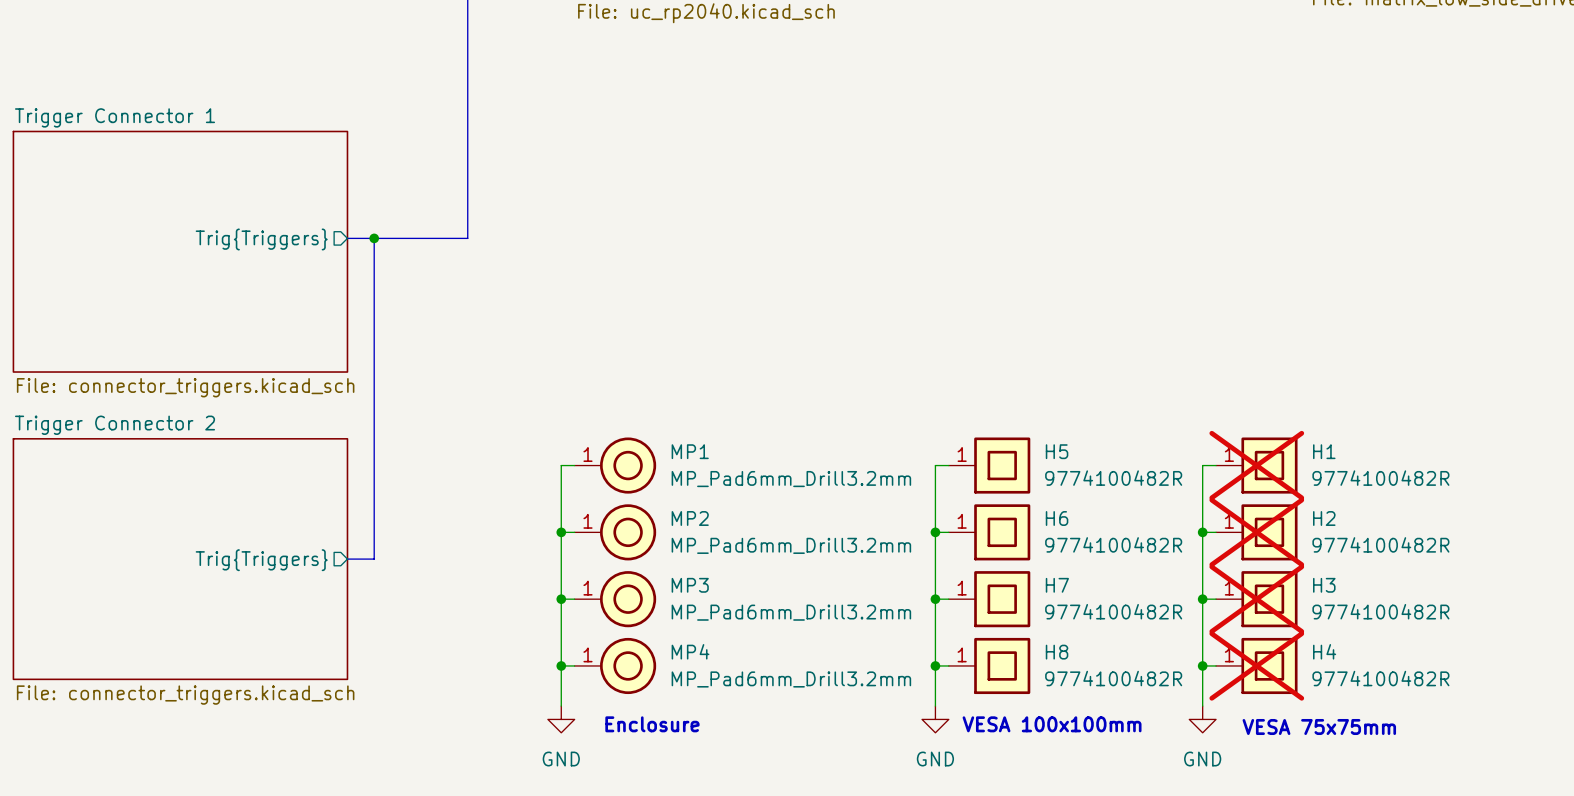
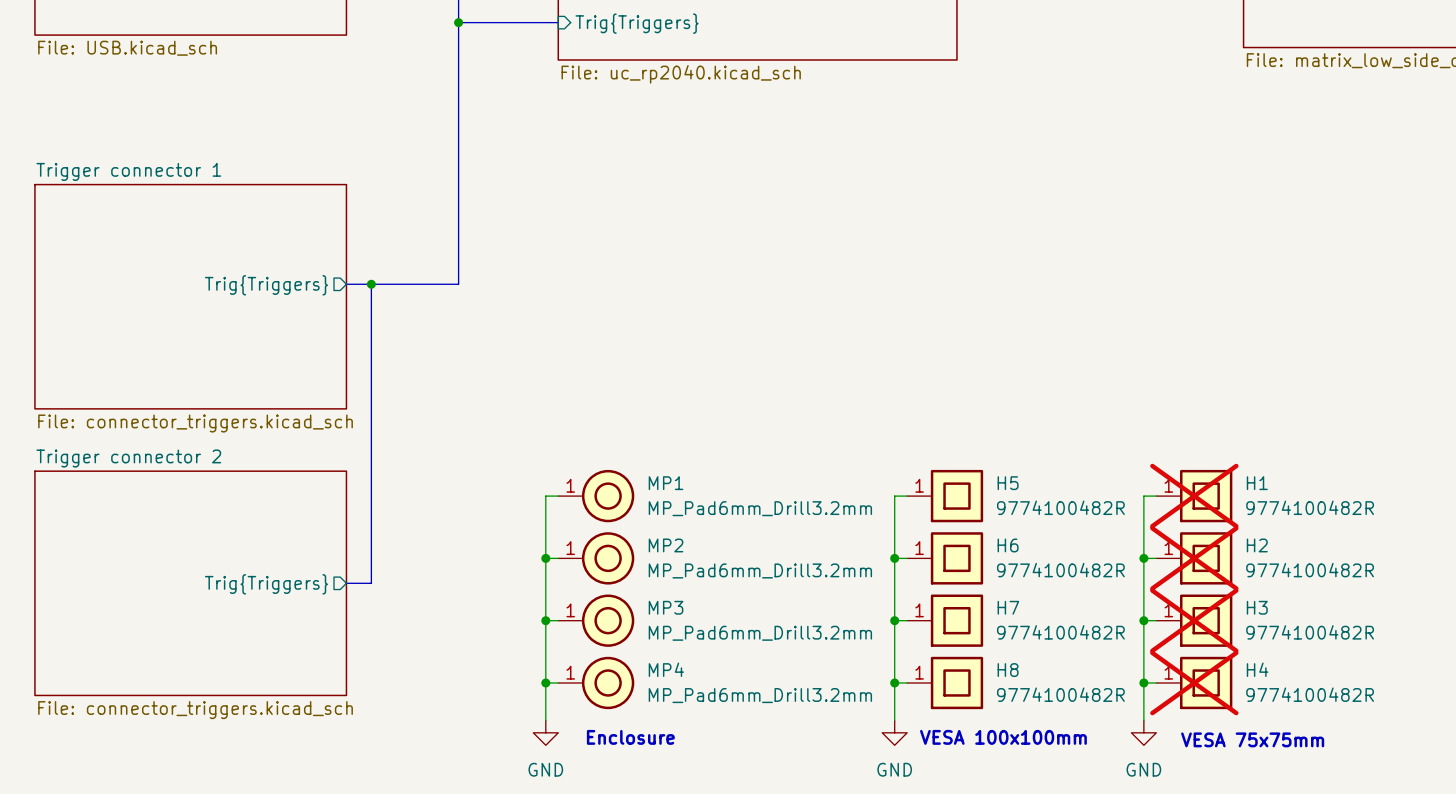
sheet Trigger Connector 1 name: Trigger Connector 1 (115, 117) -> Trigger connector 1 (128, 171)
sheet Trigger Connector 2 name: Trigger Connector 2 (115, 425) -> Trigger connector 2 (128, 458)

